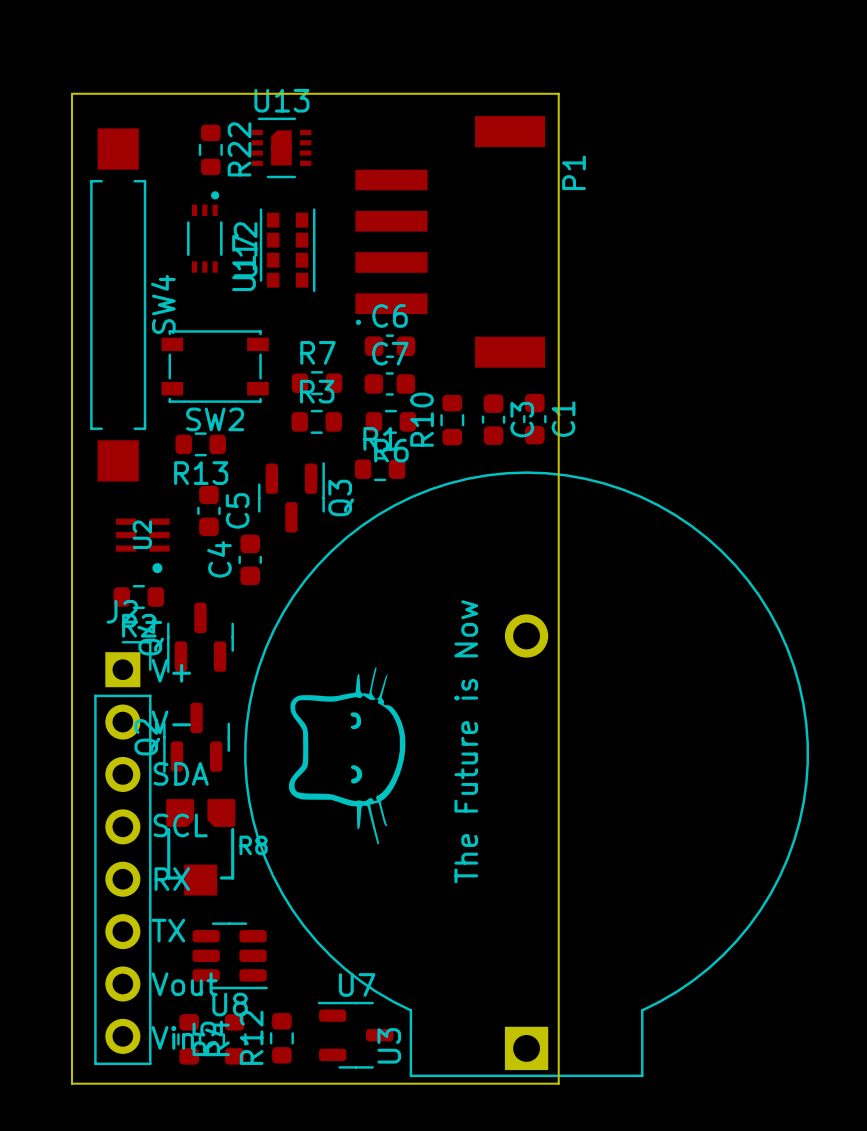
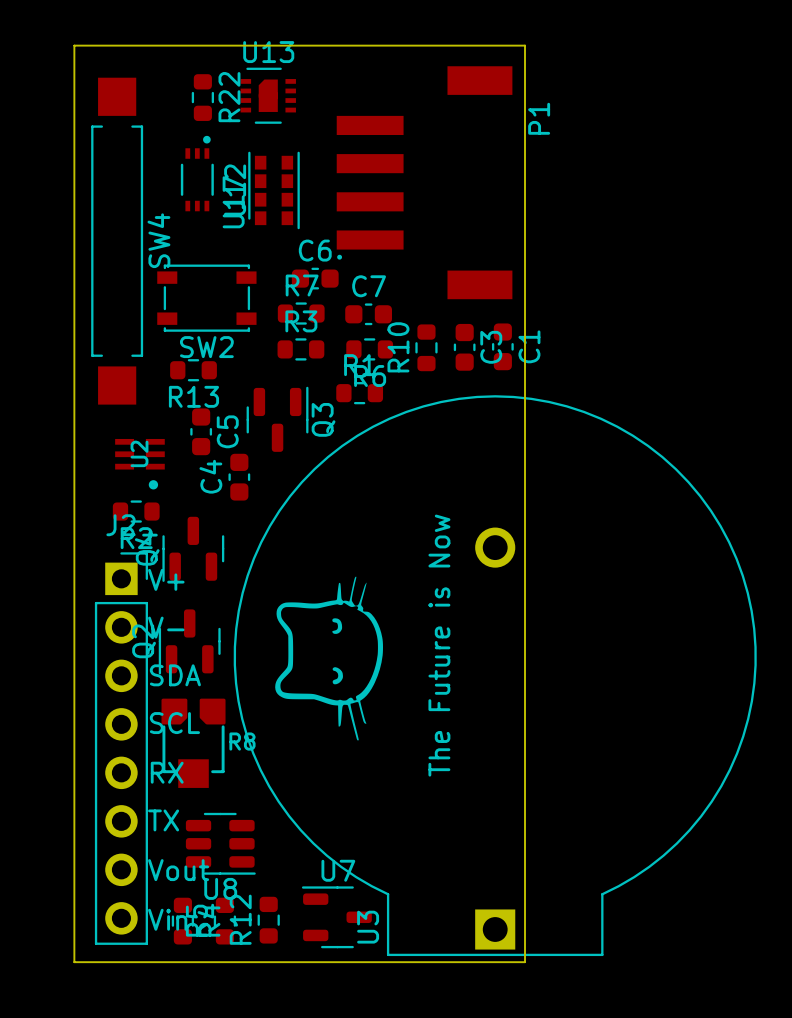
C6 position: (390, 346) -> (315, 278)

